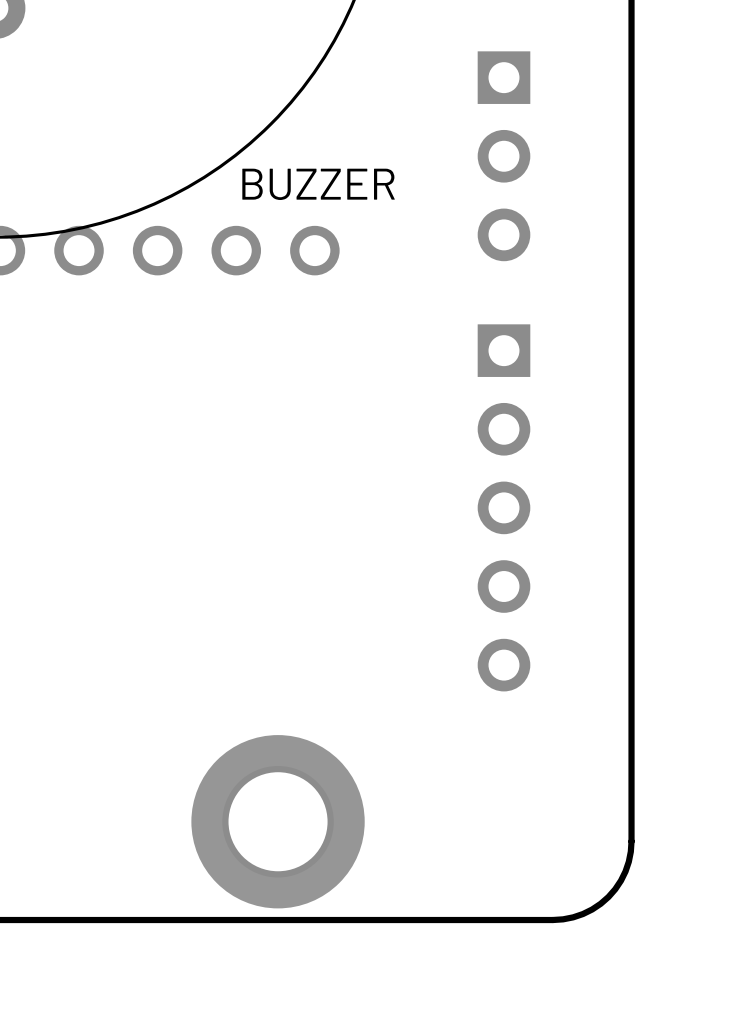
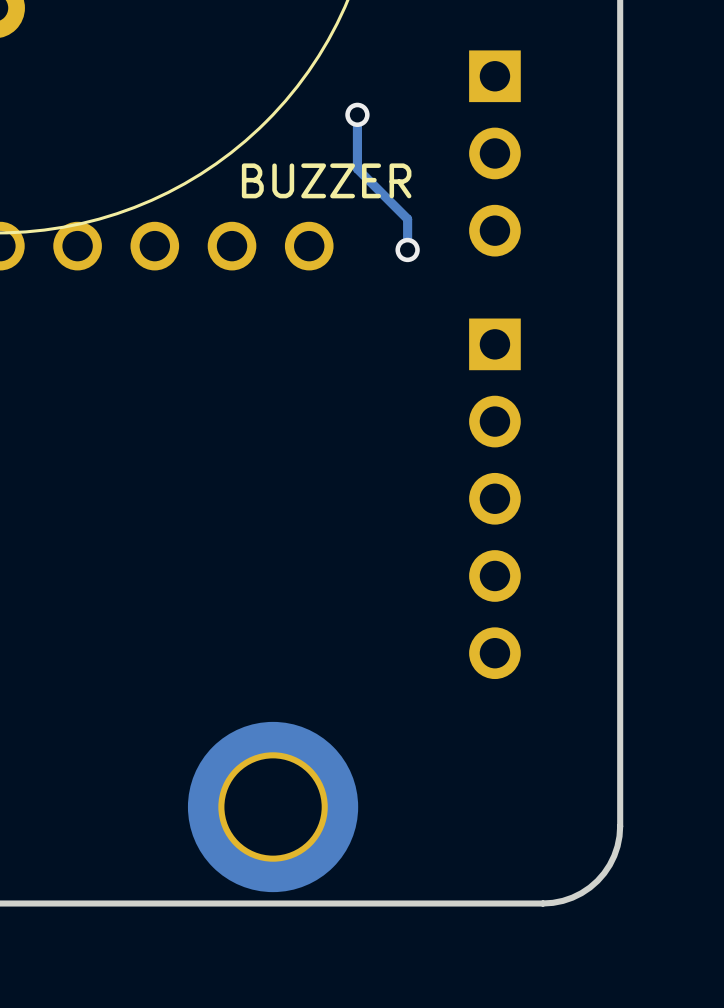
track: none -> (357, 114) (357, 168) (407, 219) (407, 249)
via: none -> (357, 114)
via: none -> (407, 249)

